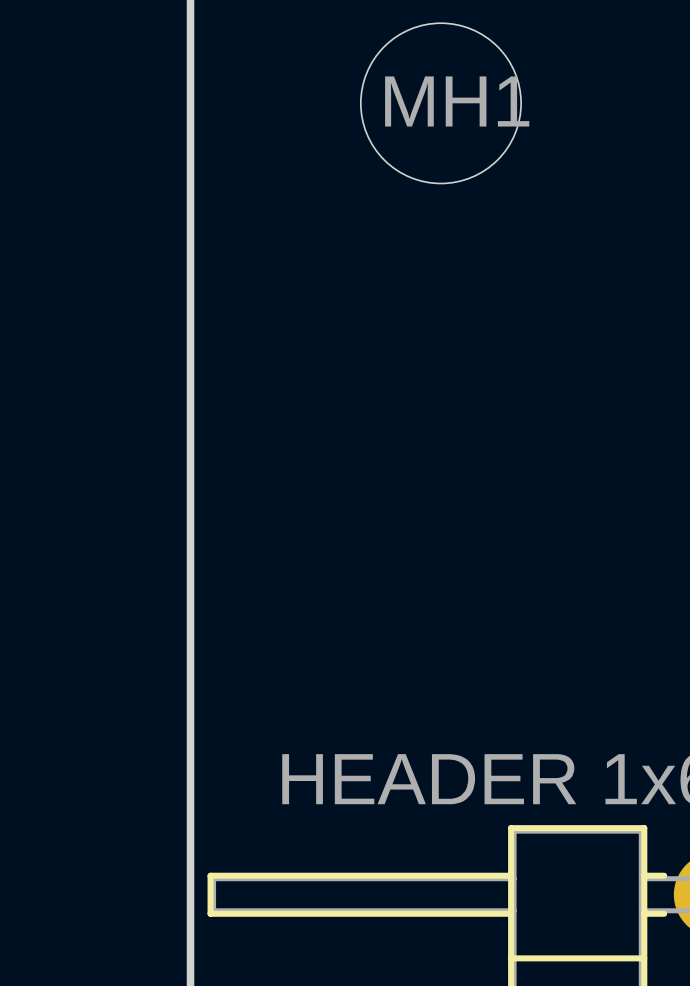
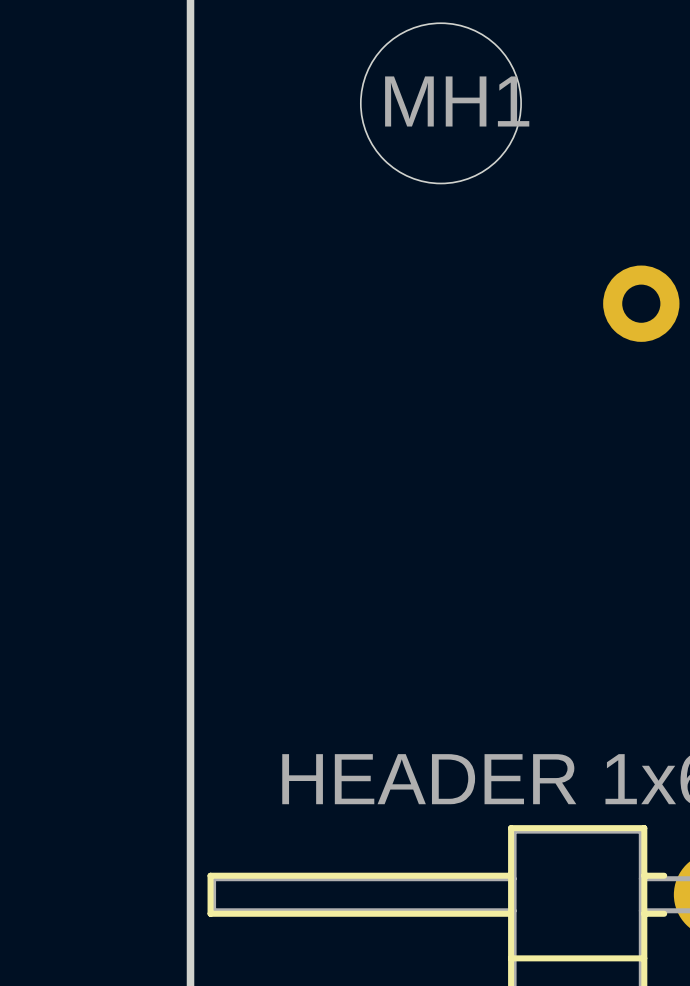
part: none -> (641, 303)

